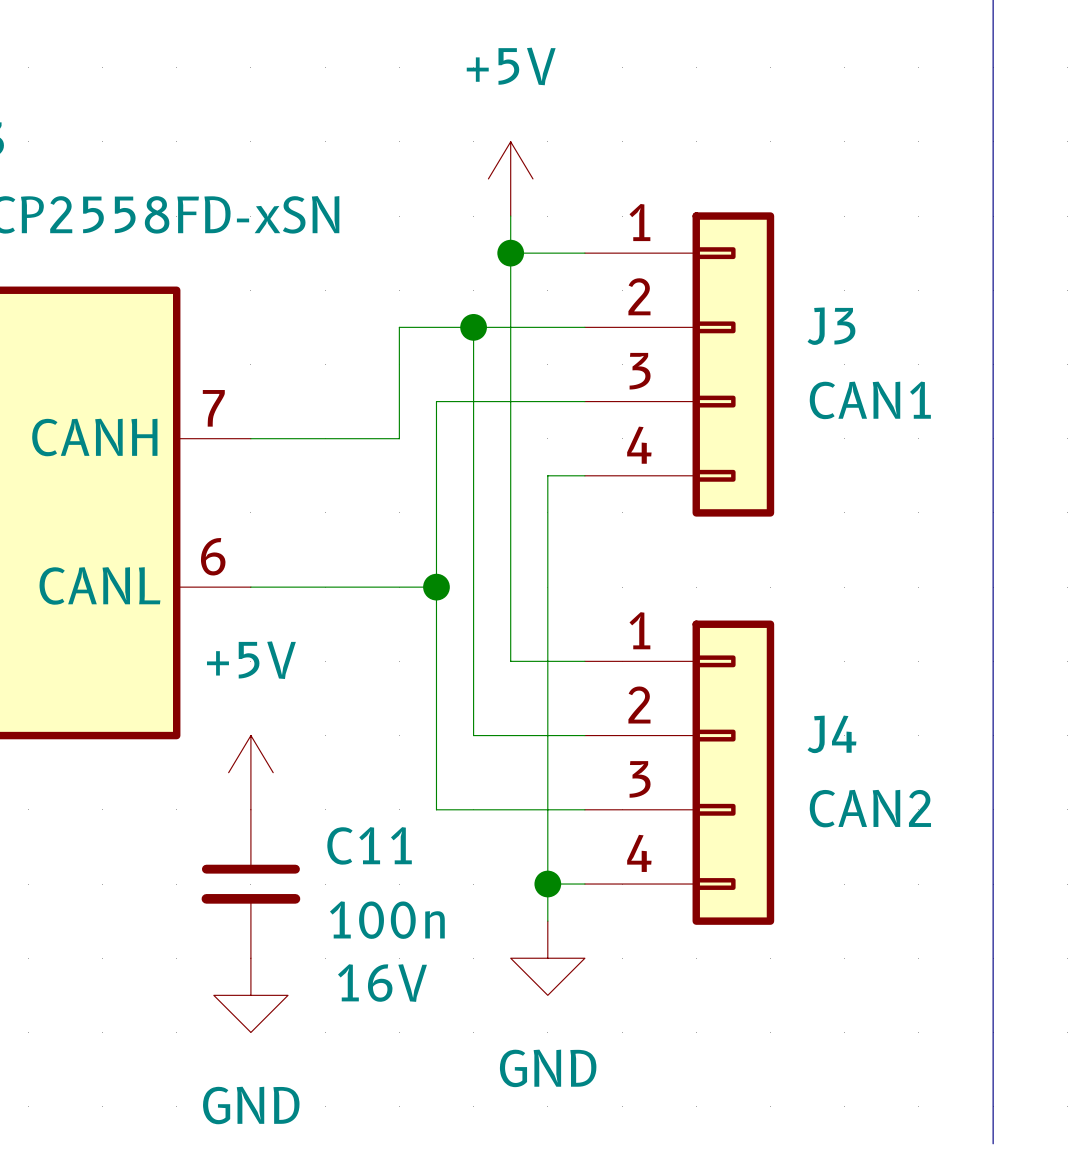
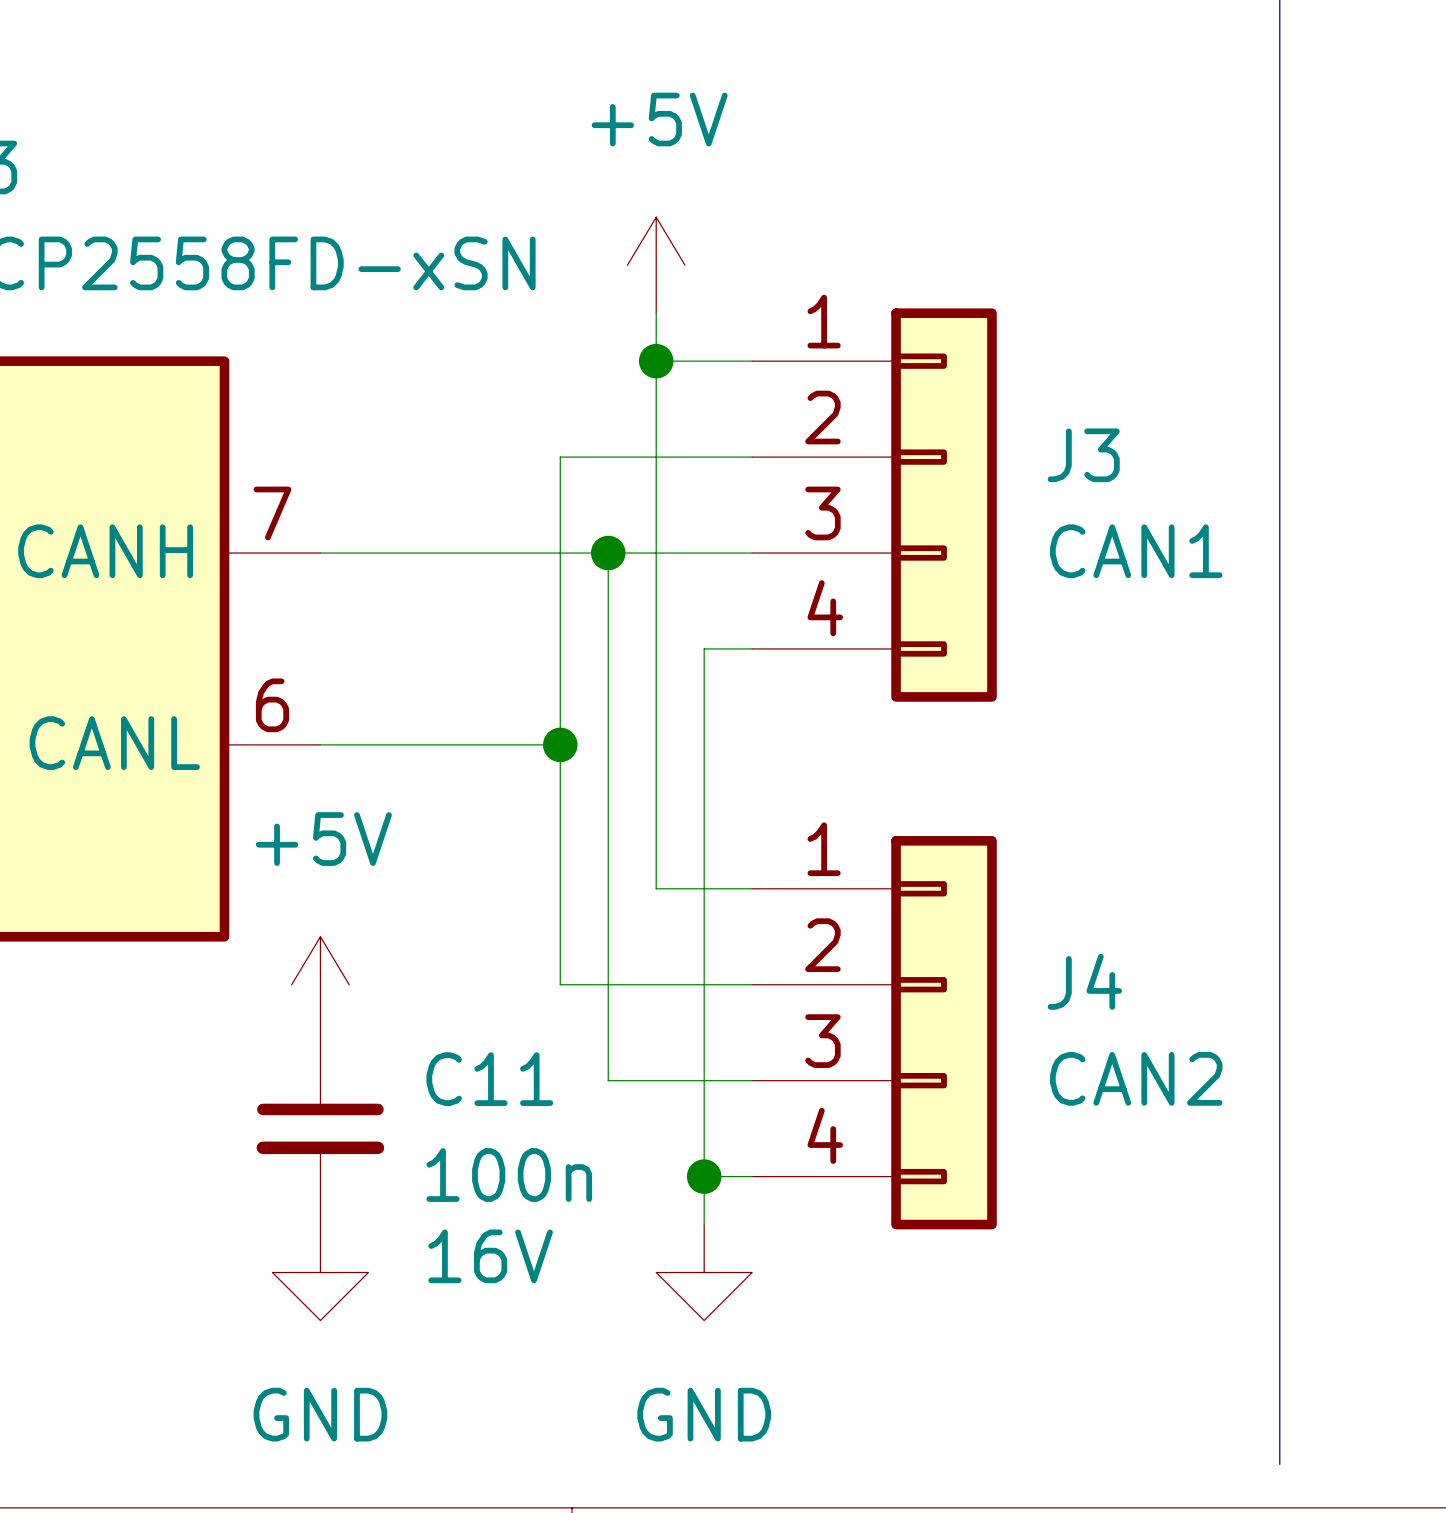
power symbol position: +5V (510, 178) -> +5V (656, 265)
wire: (510, 216) (510, 253) (584, 253) -> none
junction: (510, 253) -> none
wire: none -> (656, 361) (752, 361)
junction: none -> (656, 361)
wire: (473, 327) (473, 438) -> none
junction: (473, 327) -> none
wire: (584, 327) (399, 327) (399, 438) -> (752, 553) (512, 553)
J3 position: (679, 364) -> (874, 505)
wire: (436, 401) (584, 401) -> (560, 505) (560, 457) (752, 457)
junction: none -> (608, 553)
wire: (584, 475) (547, 475) (547, 512) -> (752, 648) (704, 648)
wire: (510, 661) (584, 661) -> (656, 840) (656, 888) (752, 888)
wire: (473, 735) (584, 735) -> (608, 936) (608, 1080) (752, 1080)
wire: (436, 772) (436, 809) (584, 809) -> (560, 984) (752, 984)
J4 position: (679, 772) -> (874, 1032)
wire: (547, 884) (584, 884) -> none
junction position: (547, 884) -> (704, 1176)
wire: none -> (752, 1176) (704, 1176) (704, 1224)
power symbol position: GND (547, 958) -> GND (704, 1272)

